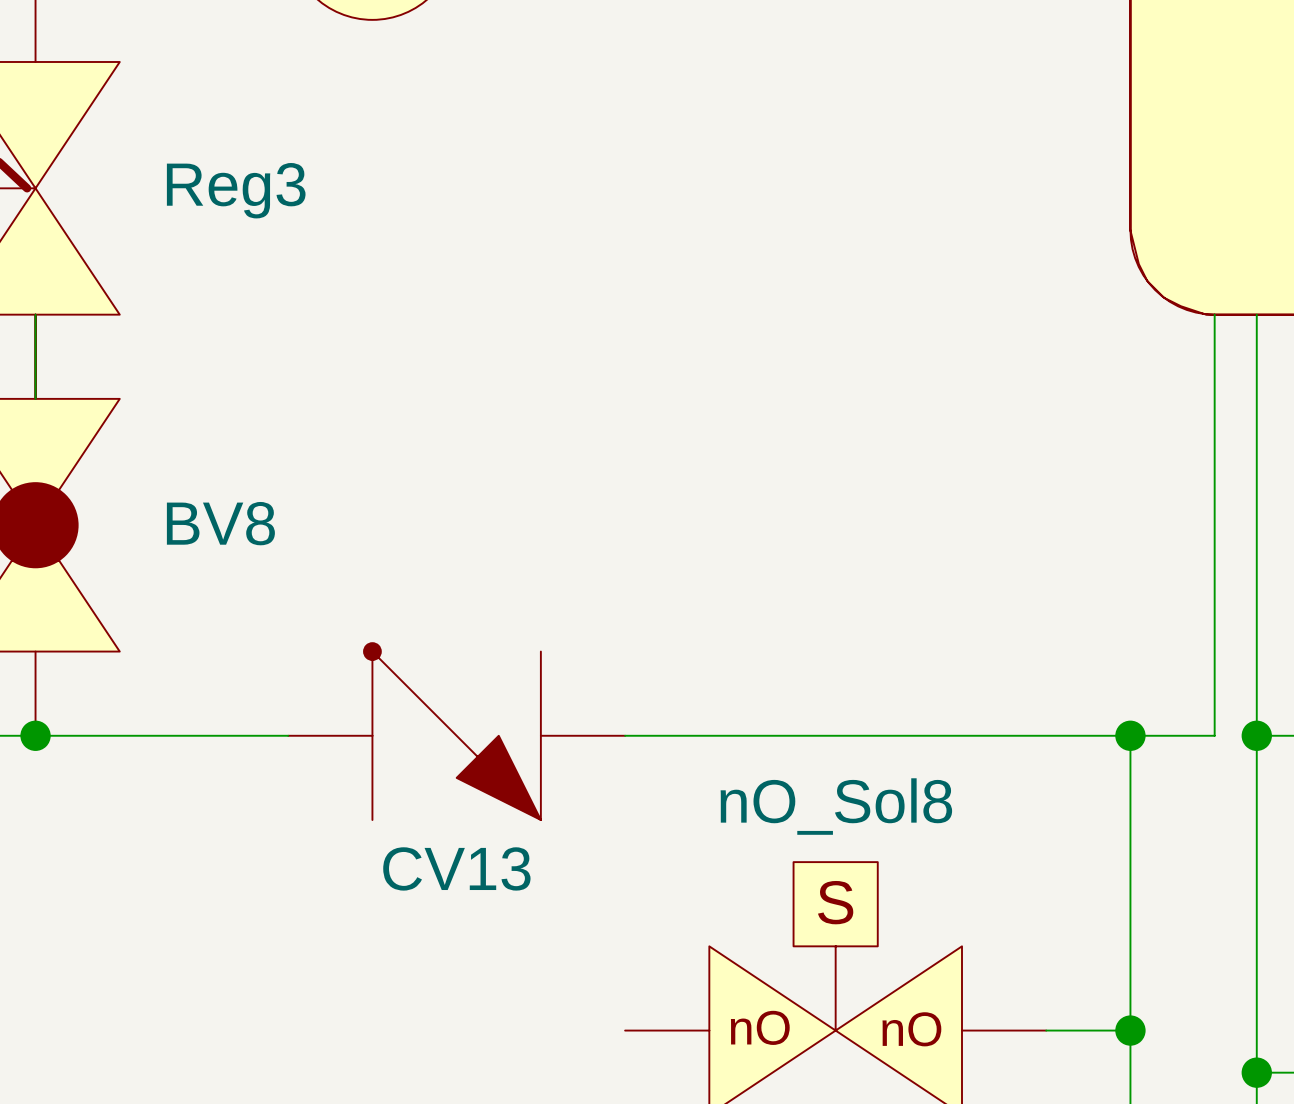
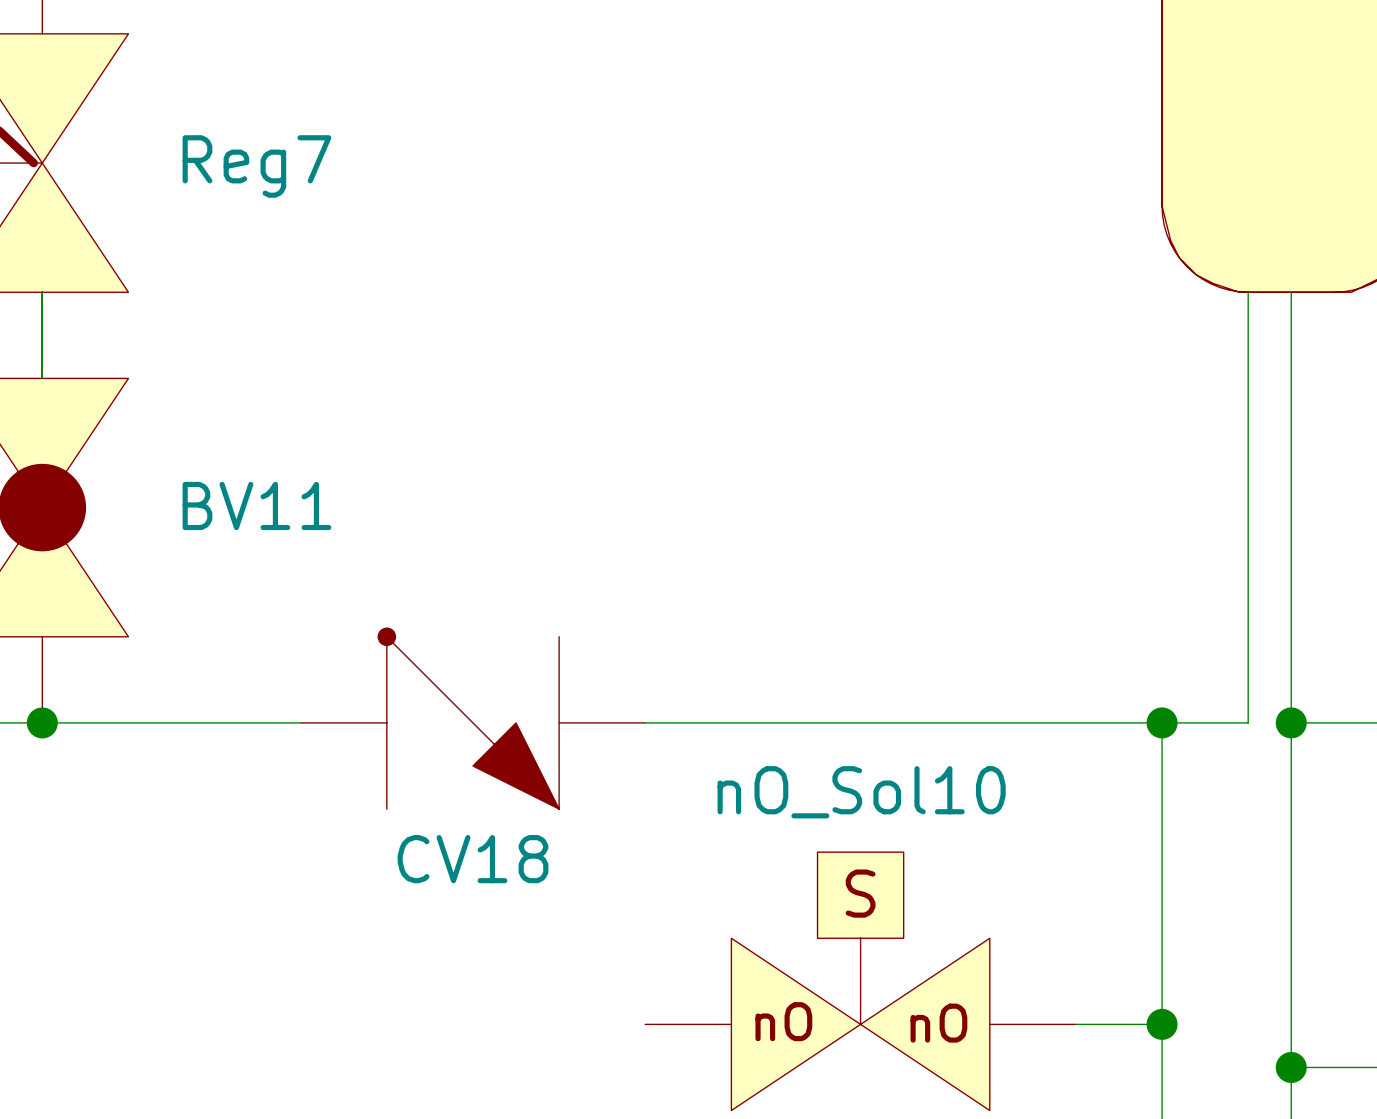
Reg3 name: Reg3 (236, 190) -> Reg7 (256, 166)
BV8 name: BV8 (220, 523) -> BV11 (256, 505)
nO_Sol8 name: nO_Sol8 (836, 806) -> nO_Sol10 (861, 792)
CV13 name: CV13 (456, 868) -> CV18 (472, 859)

